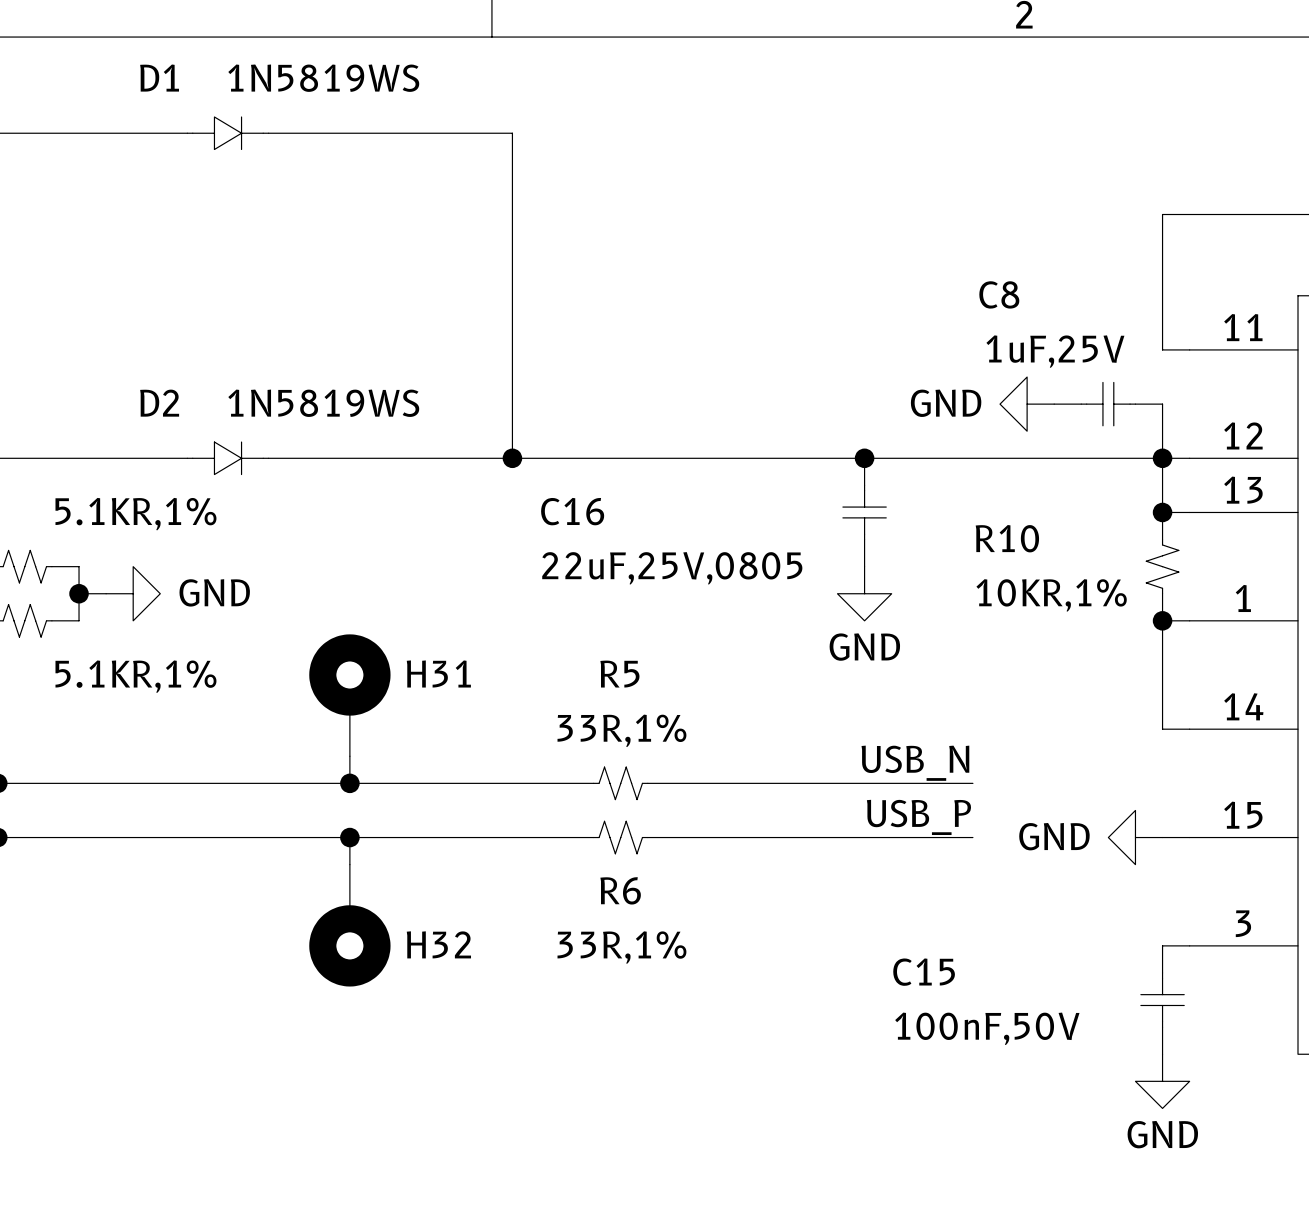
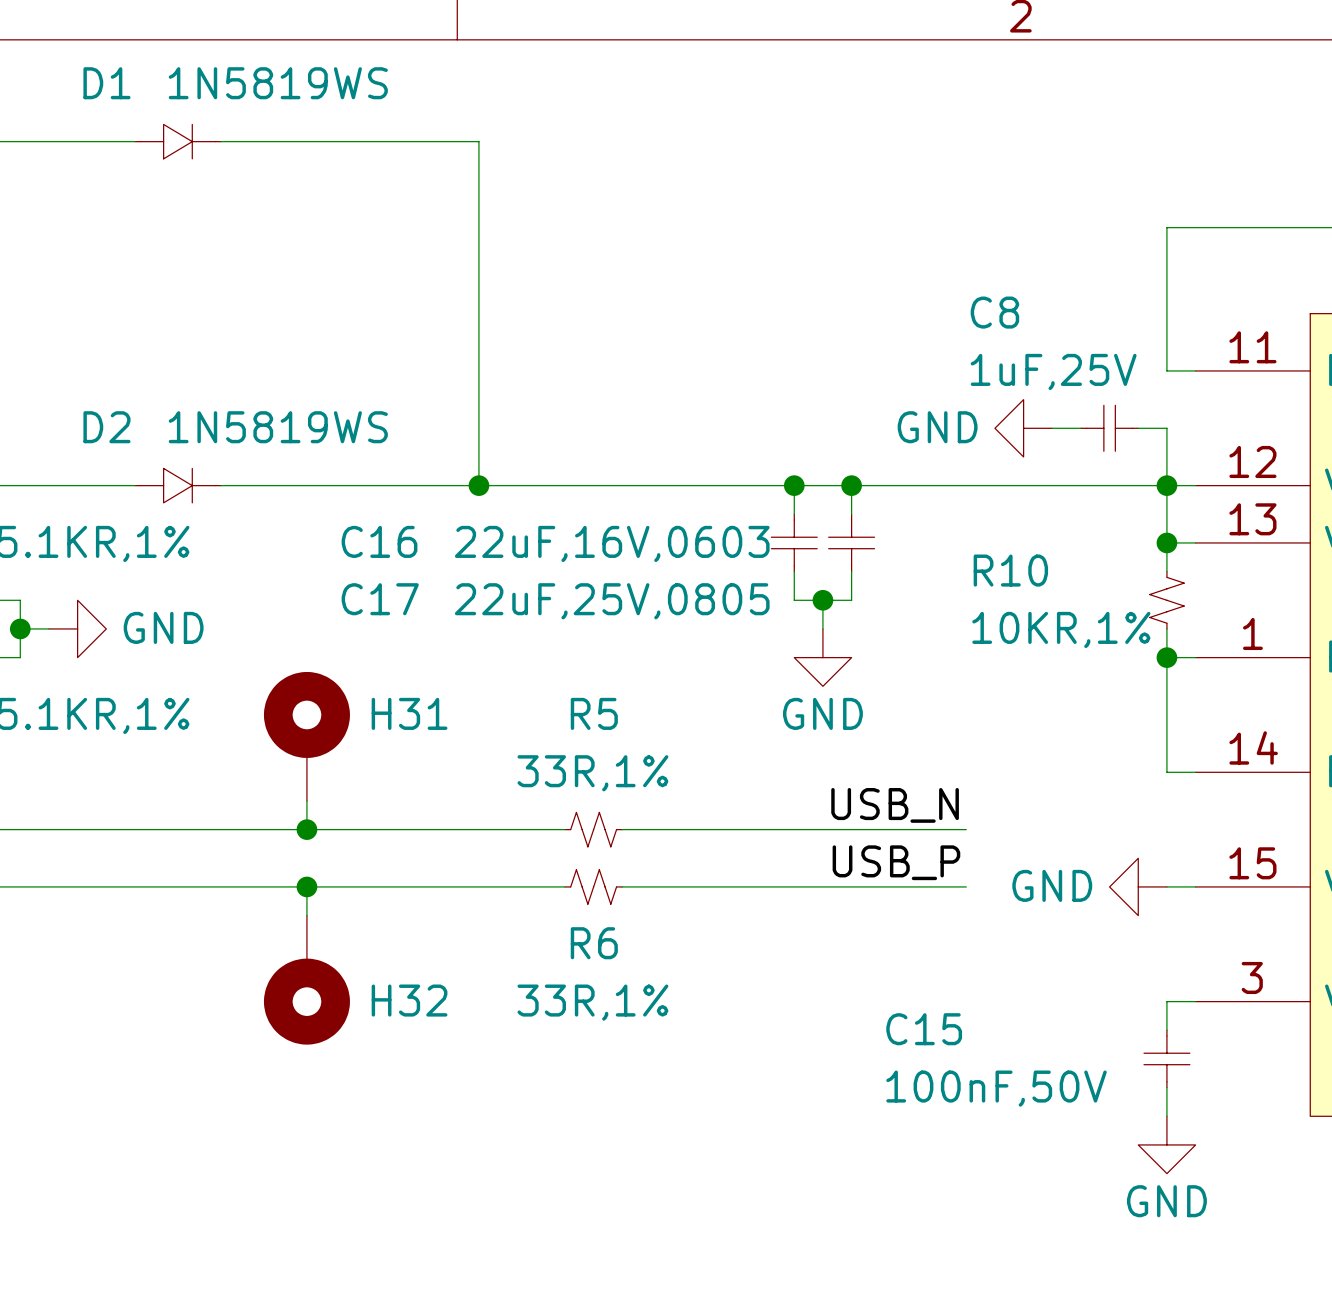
wire: none -> (794, 485) (794, 514)
junction: none -> (794, 485)
C16 name position: C16 (572, 511) -> C16 (379, 541)
C17: none -> 22uF,16V,0603 (794, 542)
wire: none -> (794, 571) (794, 600) (851, 600)
wire: none -> (822, 600) (822, 628)
junction: none -> (822, 600)
C16 value position: 22uF,25V,0805 (672, 568) -> 22uF,25V,0805 (612, 601)
power symbol position: GND (864, 593) -> GND (822, 657)

